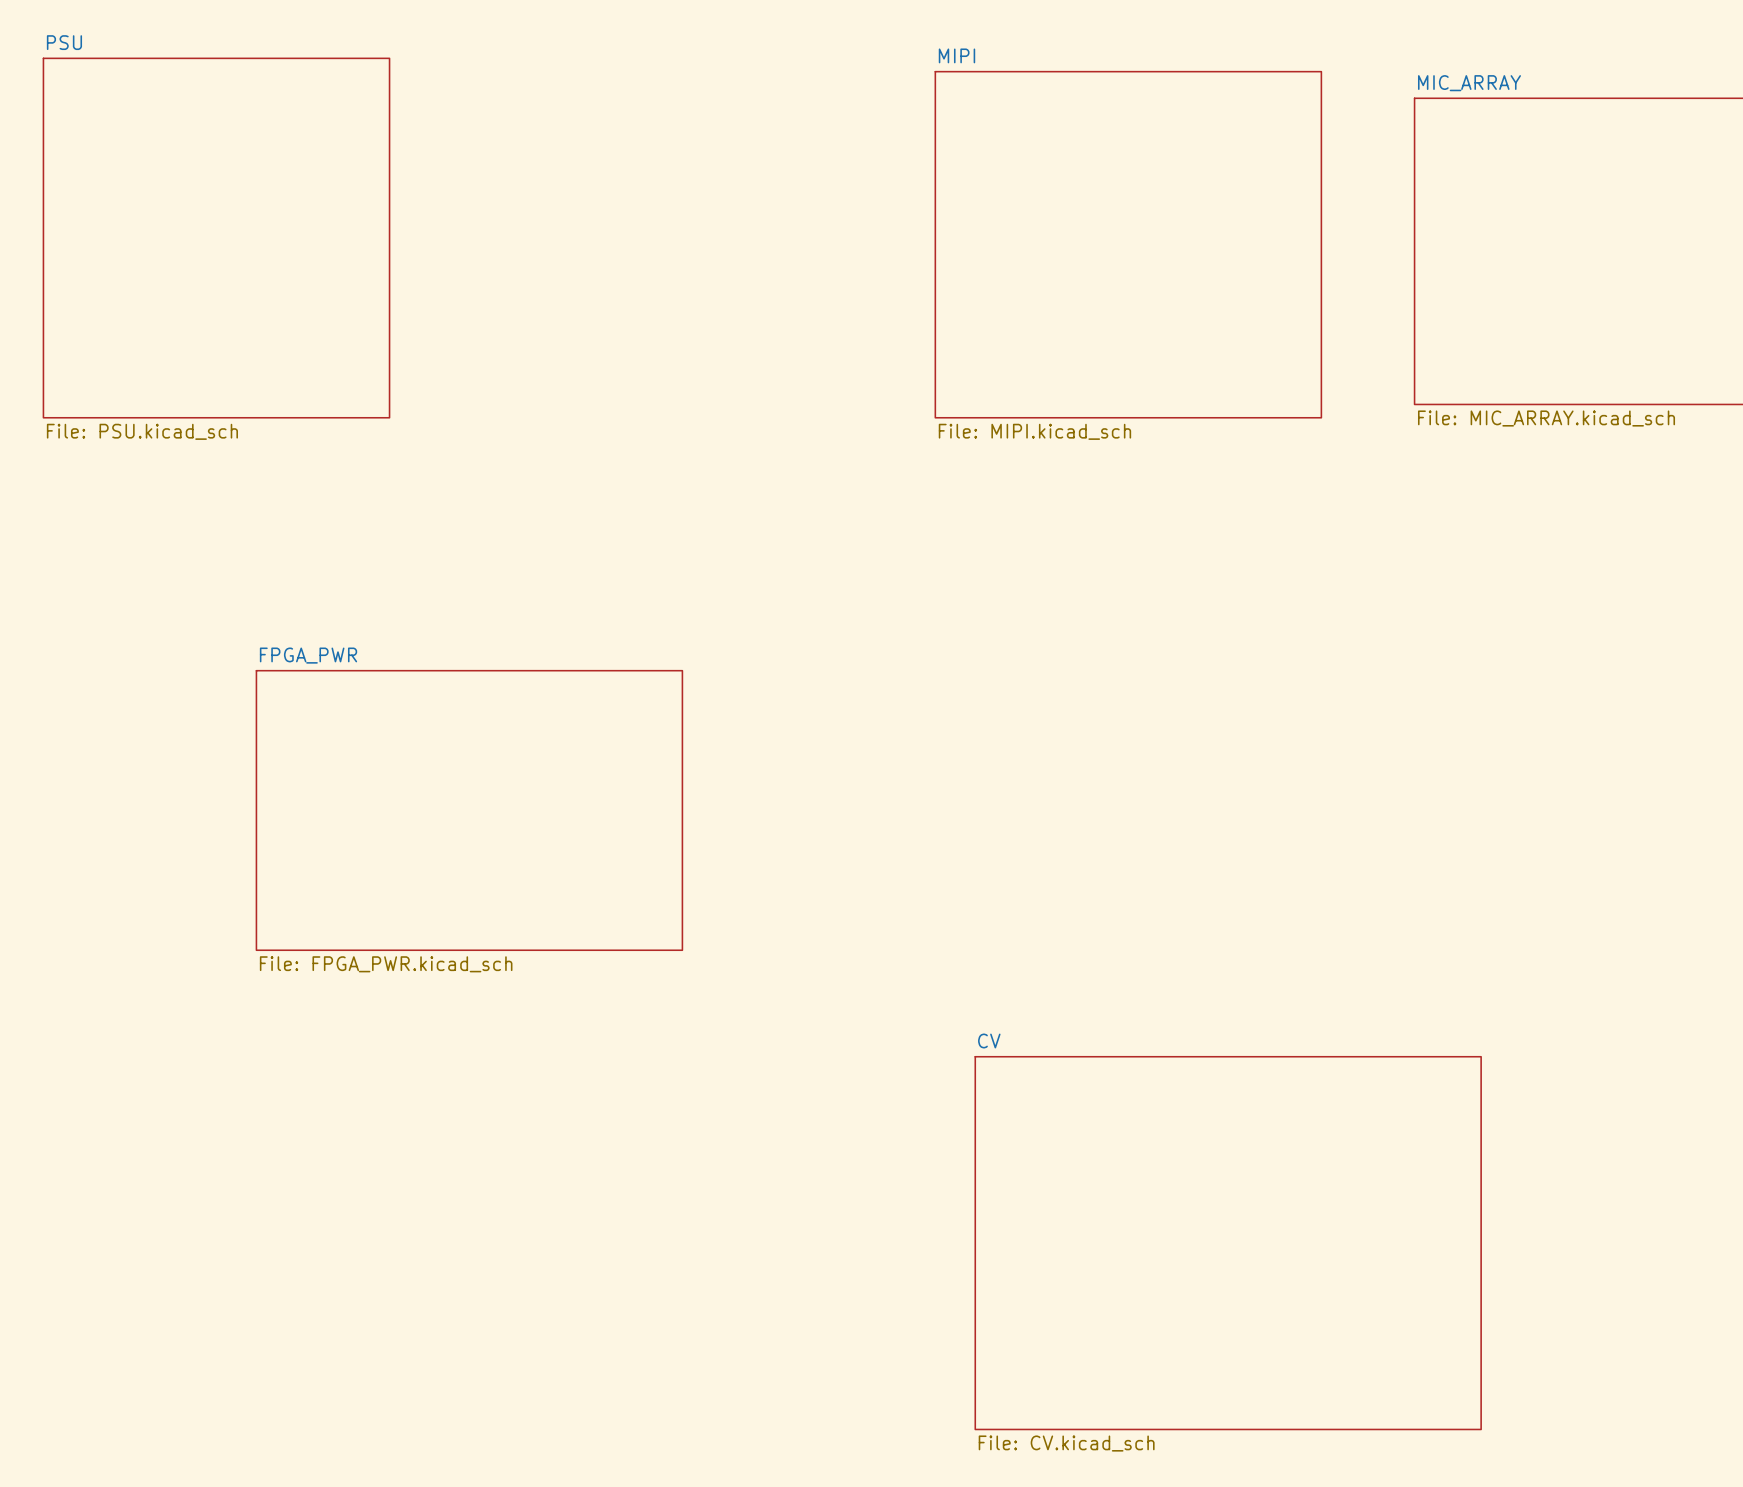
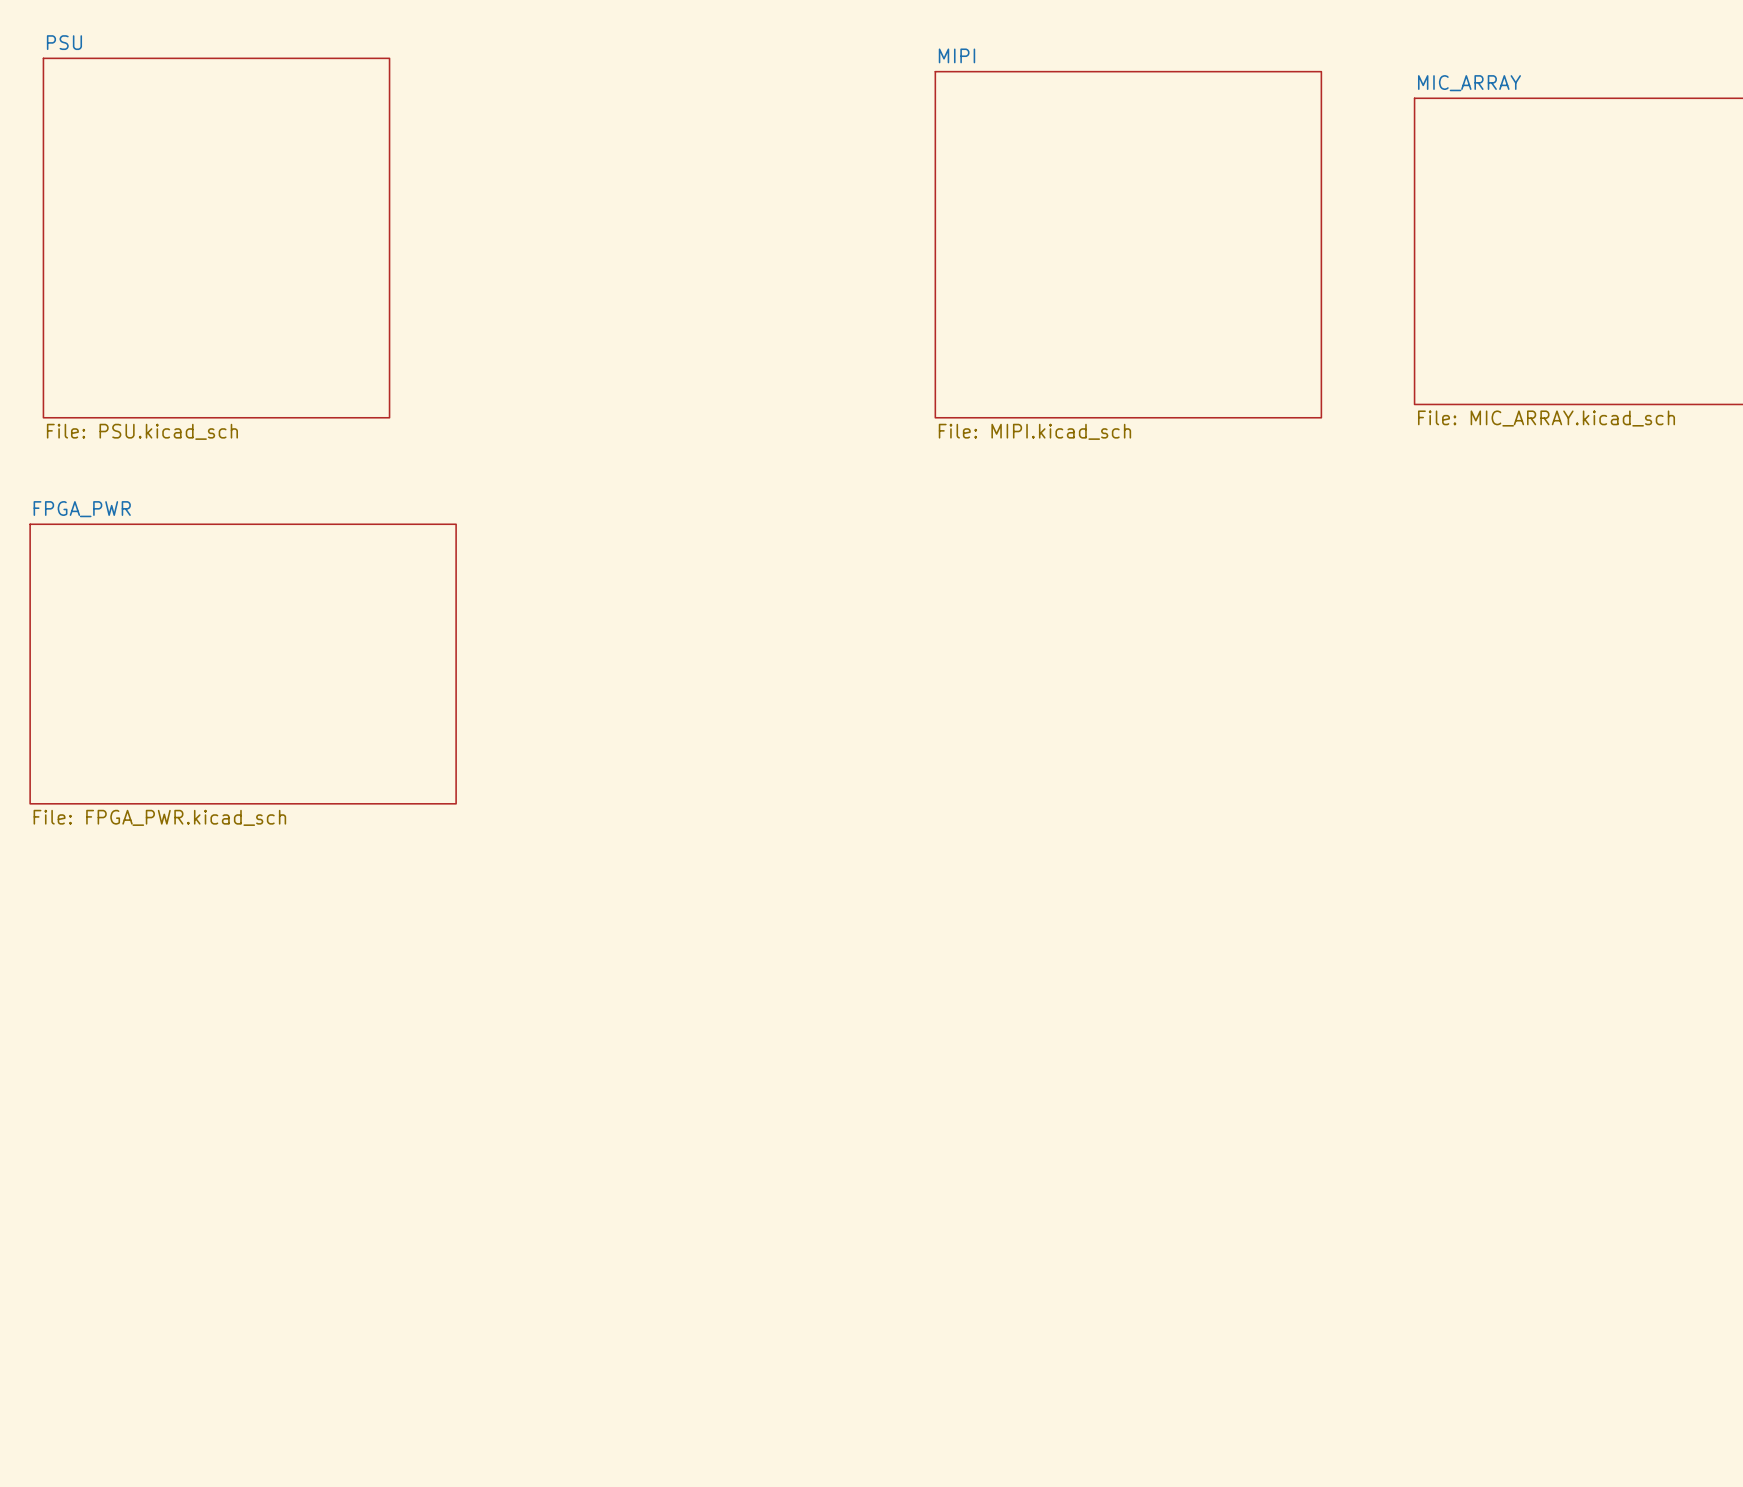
sheet FPGA_PWR: none -> File: FPGA_PWR.kicad_sch (243, 664)
sheet FPGA_PWR: File: FPGA_PWR.kicad_sch (469, 810) -> none
sheet CV: File: CV.kicad_sch (1228, 1243) -> none

